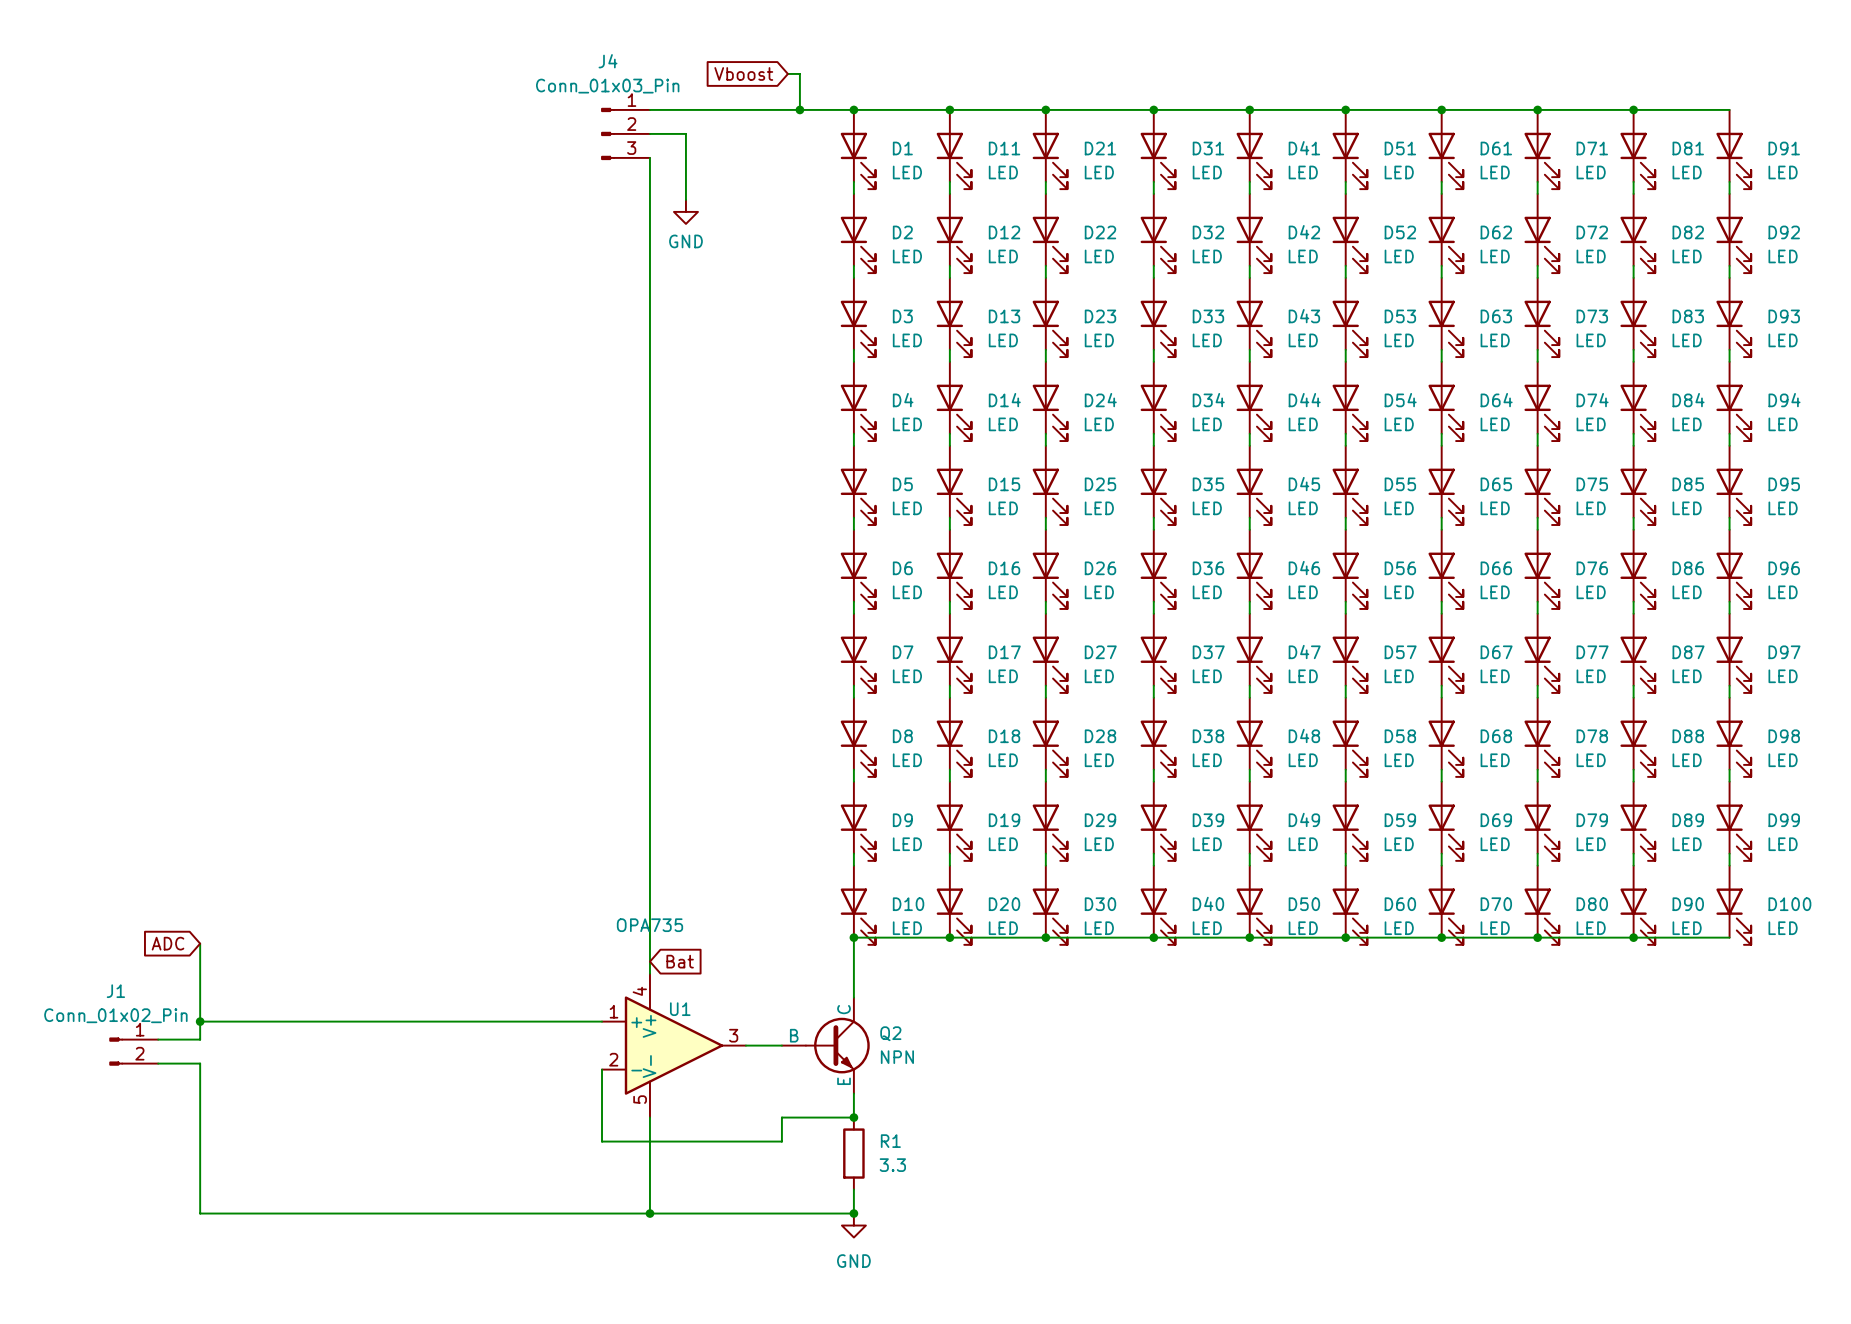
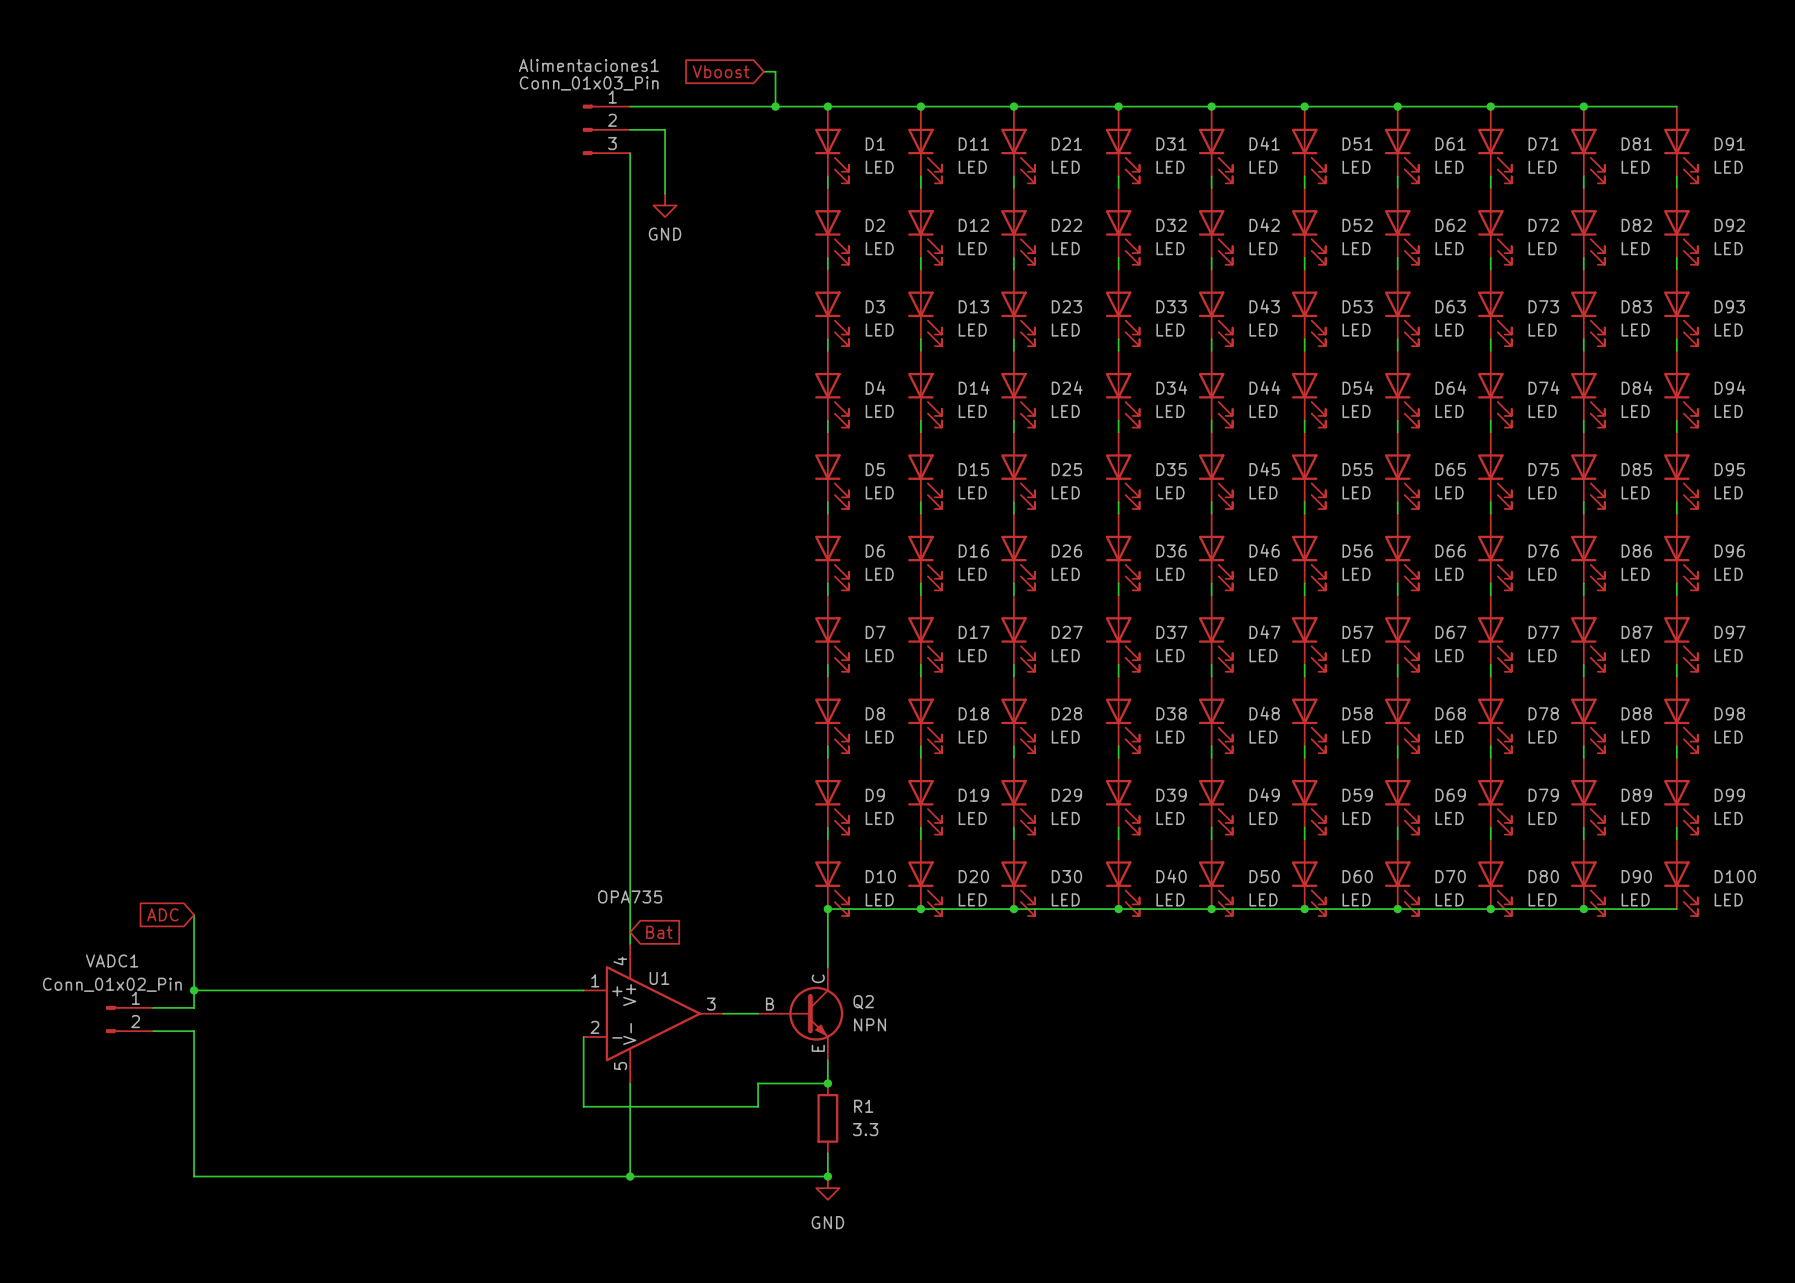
J4 name: J4 (608, 61) -> Alimentaciones1 (588, 65)
J1 name: J1 (115, 991) -> VADC1 (112, 960)

